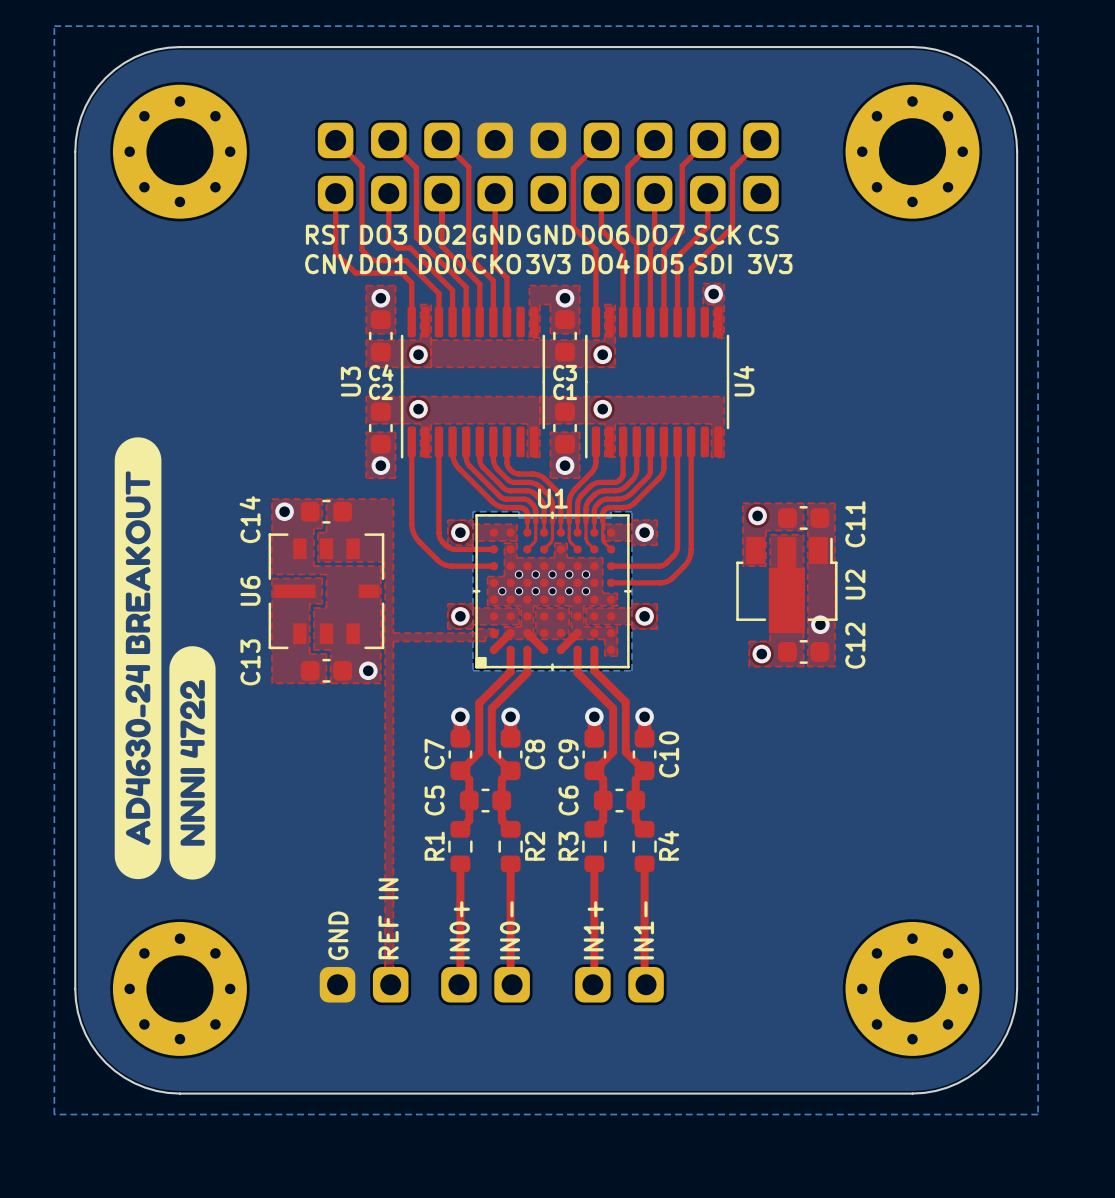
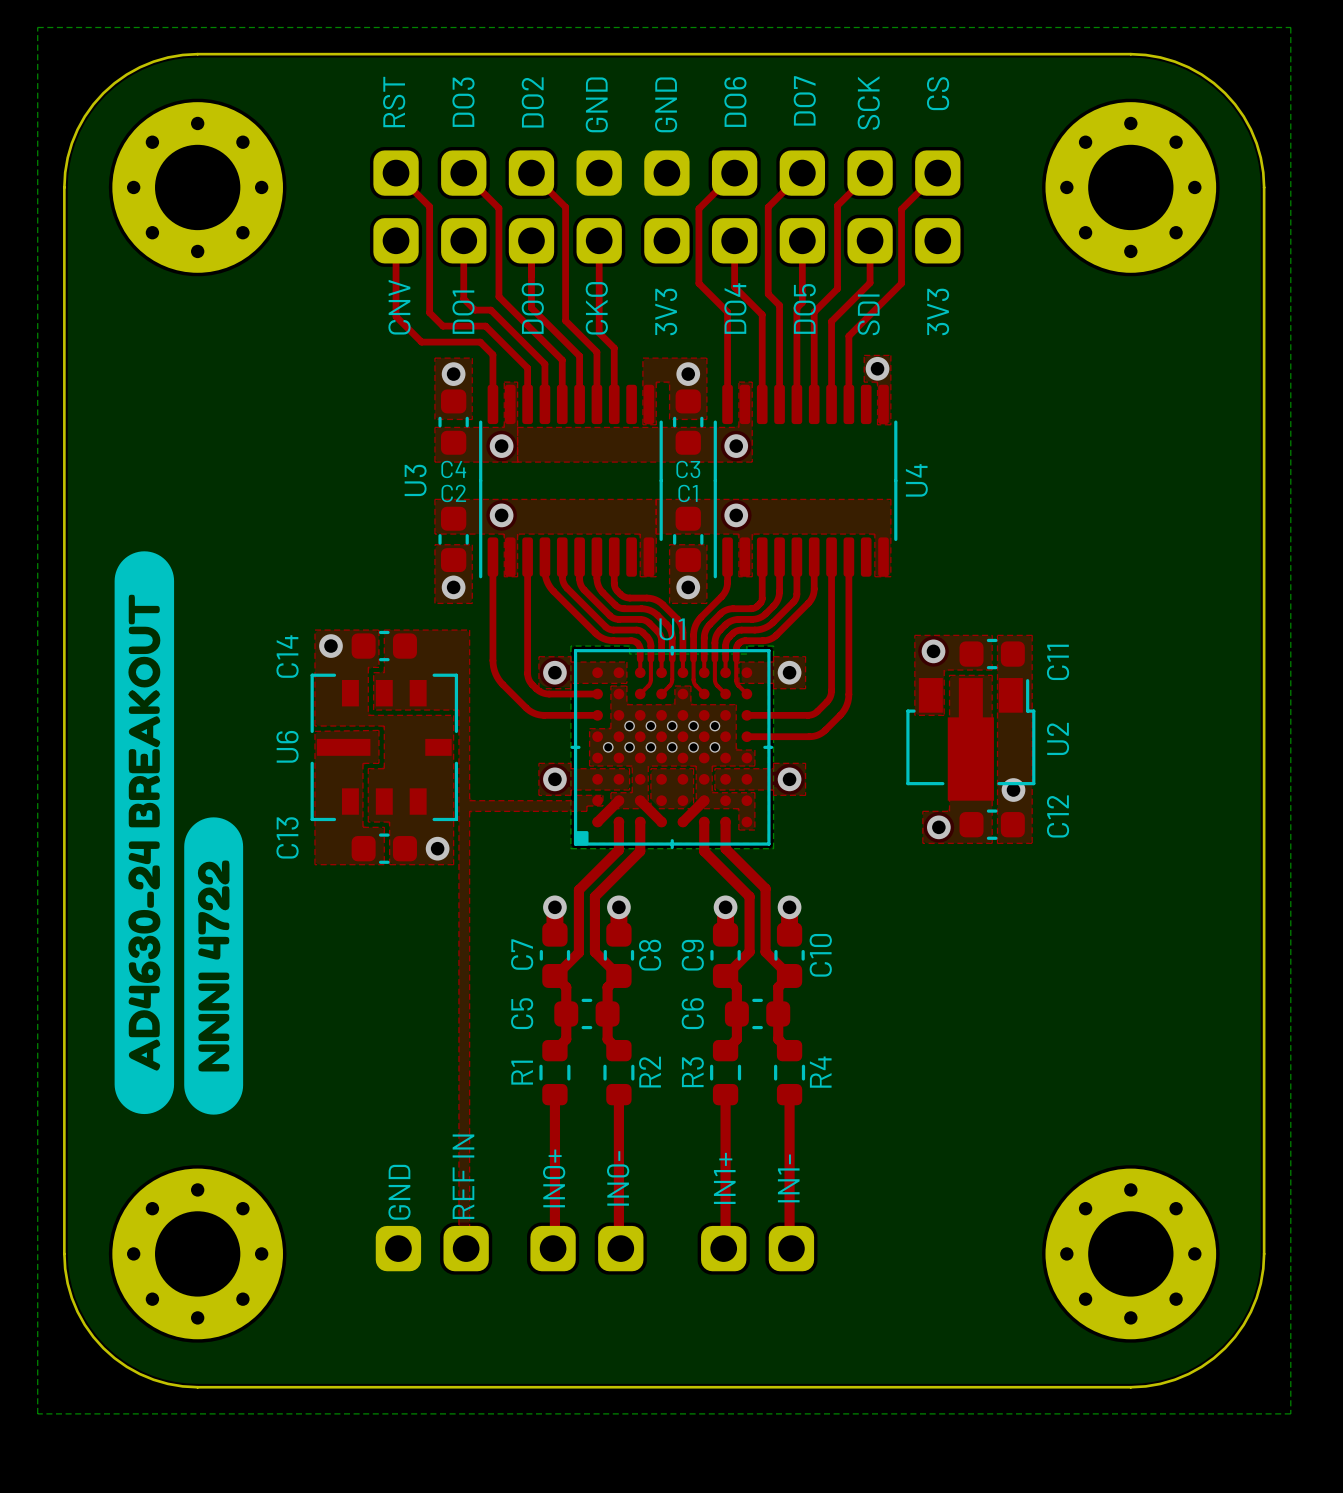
text: none -> GND (596, 104)
text: none -> GND (666, 104)
text rotation: 0° (327, 234) -> 90° counterclockwise (394, 102)
text position: RST (327, 234) -> RST (394, 102)
text rotation: 0° (383, 234) -> 90° counterclockwise (463, 102)
text position: DO3 (383, 234) -> DO3 (463, 102)
text rotation: 0° (442, 234) -> 90° counterclockwise (532, 102)
text position: DO2 (442, 234) -> DO2 (532, 102)
text: GND (496, 234) -> none
text: GND (551, 234) -> none
text rotation: 0° (605, 234) -> 90° counterclockwise (735, 101)
text position: DO6 (605, 234) -> DO6 (735, 101)
text rotation: 0° (660, 234) -> 90° counterclockwise (804, 100)
text position: DO7 (660, 234) -> DO7 (804, 100)
text rotation: 0° (717, 234) -> 90° counterclockwise (868, 103)
text position: SCK (717, 234) -> SCK (868, 103)
text rotation: 0° (763, 234) -> 90° counterclockwise (938, 93)
text position: CS (763, 234) -> CS (938, 93)
text rotation: 0° (606, 263) -> 90° counterclockwise (735, 308)
text rotation: 0° (328, 264) -> 90° counterclockwise (399, 307)
text rotation: 0° (383, 264) -> 90° counterclockwise (463, 312)
text rotation: 0° (442, 264) -> 90° counterclockwise (532, 308)
text rotation: 0° (496, 264) -> 90° counterclockwise (596, 308)
text rotation: 0° (548, 264) -> 90° counterclockwise (666, 311)
text rotation: 0° (660, 264) -> 90° counterclockwise (804, 308)
text rotation: 0° (712, 264) -> 90° counterclockwise (868, 314)
text rotation: 0° (770, 264) -> 90° counterclockwise (938, 311)

